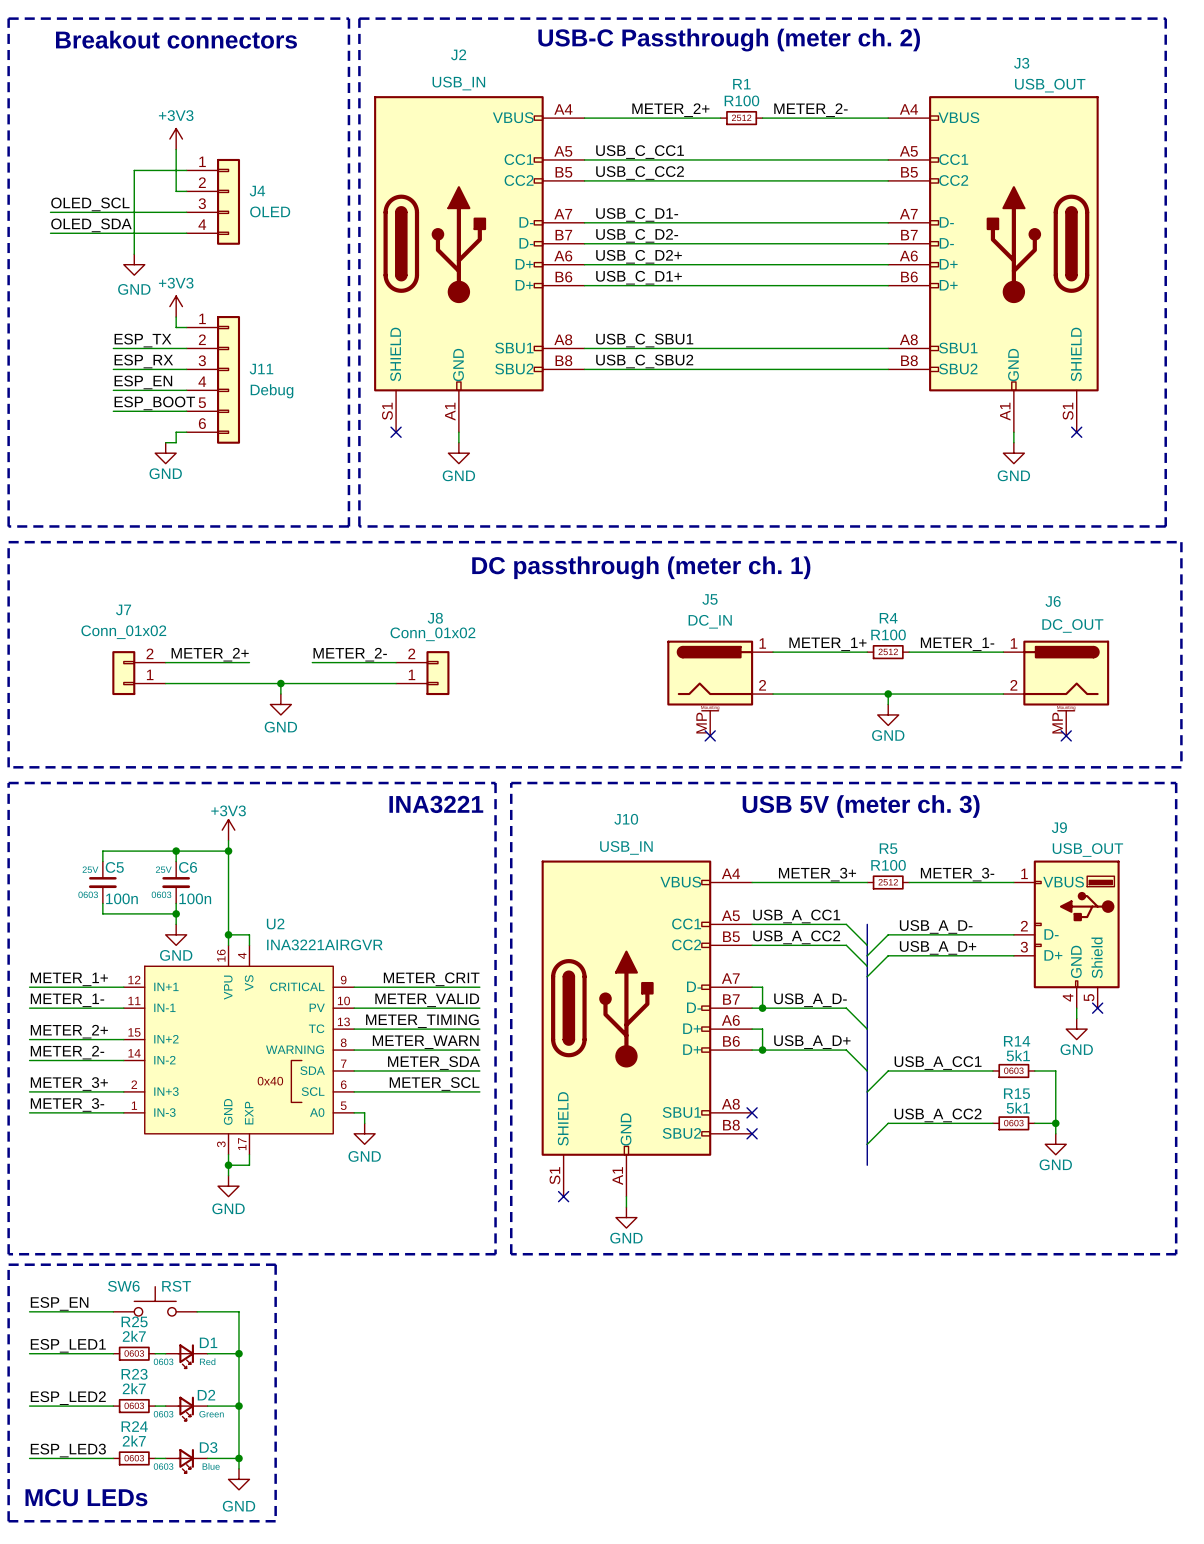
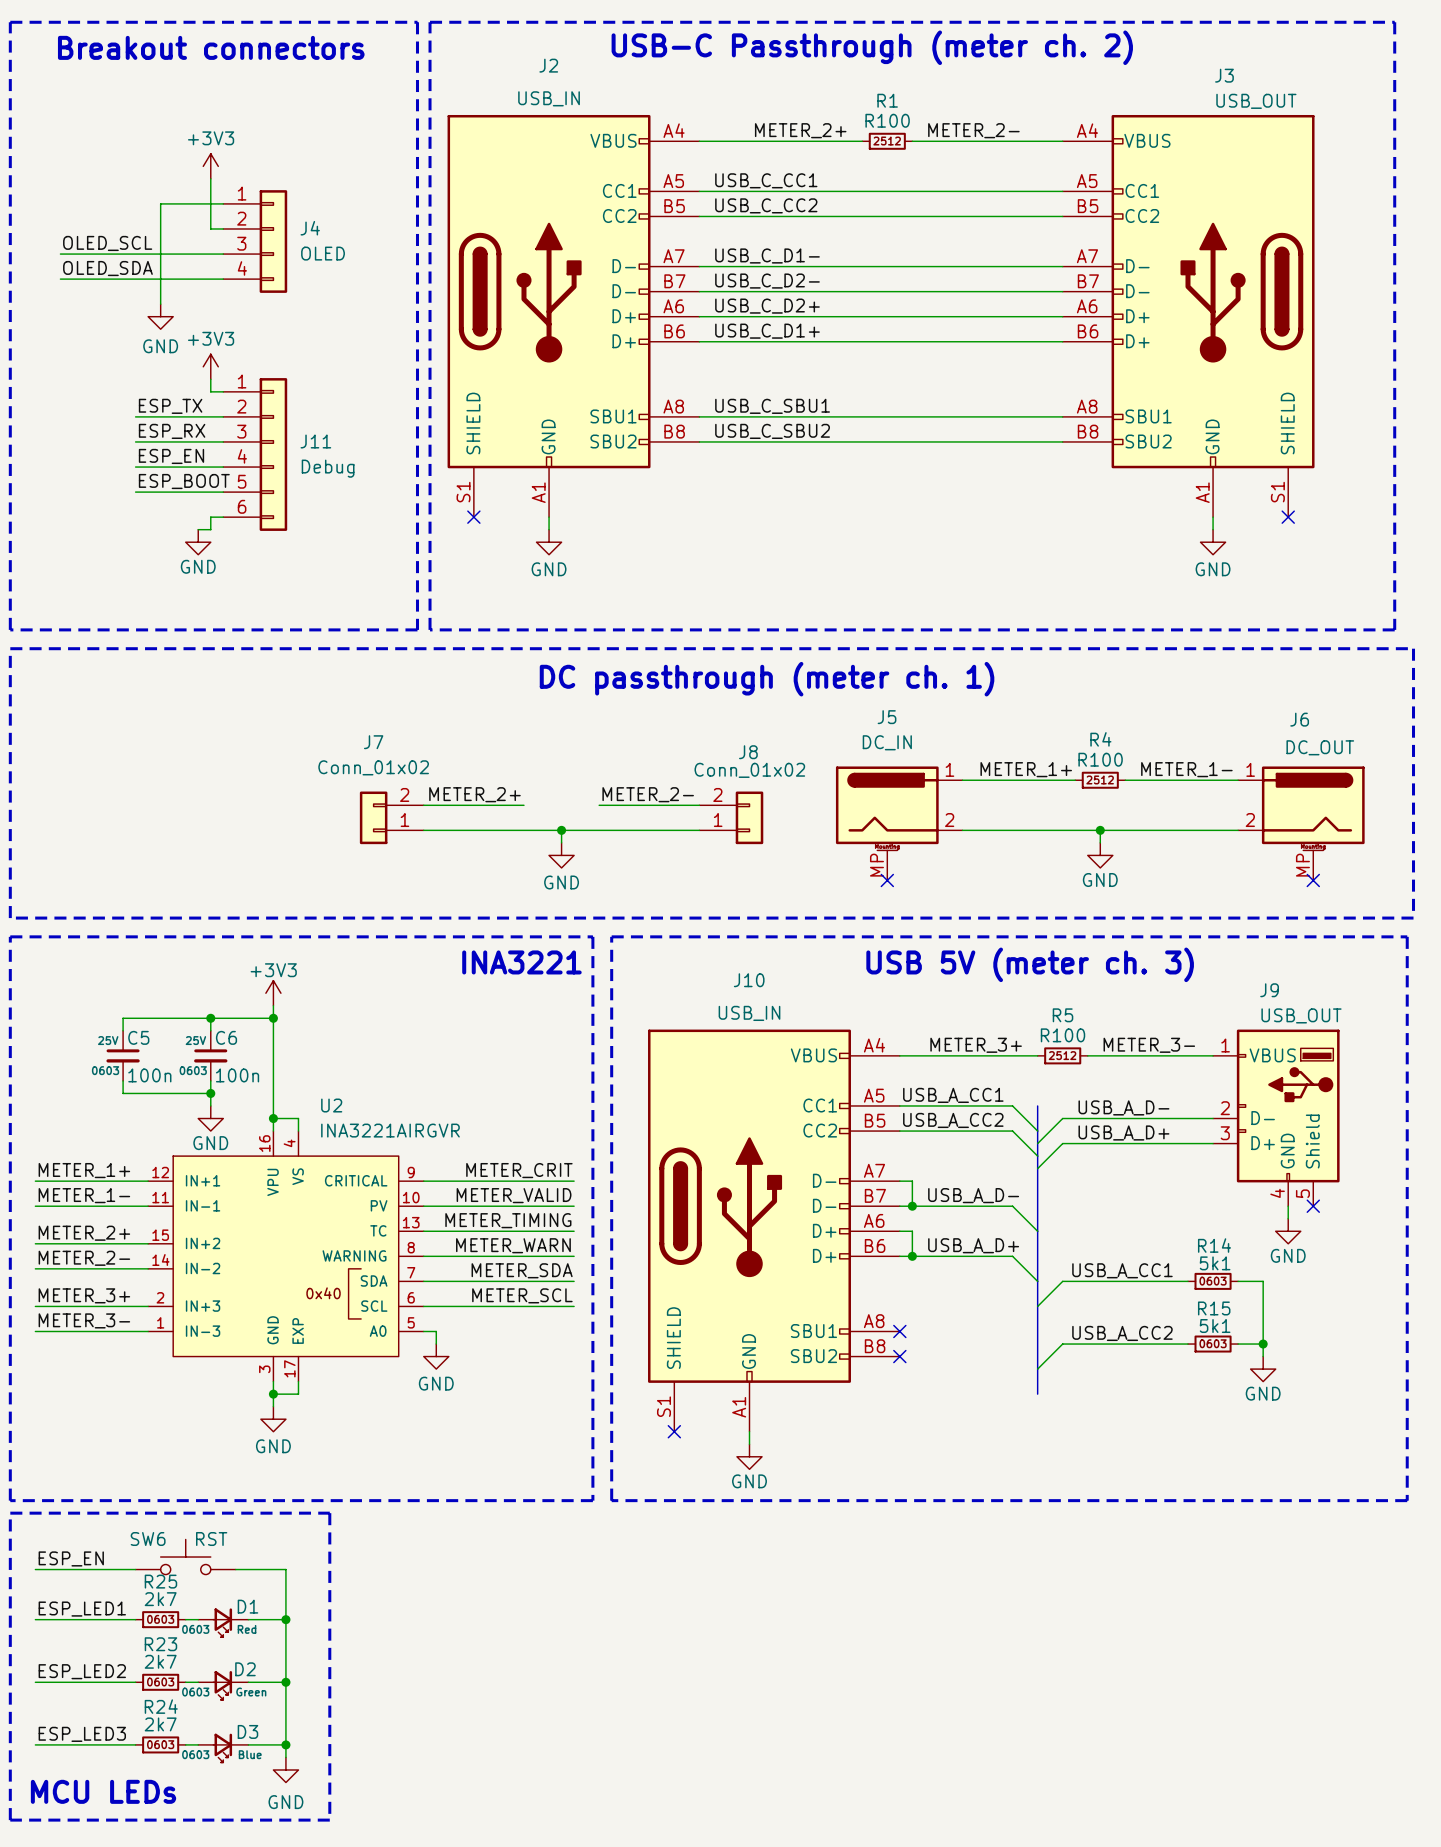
label position: METER_1+ (827, 644) -> METER_1+ (1026, 769)
label position: METER_1- (957, 644) -> METER_1- (1186, 769)
R4 position: (888, 652) -> (1100, 780)
label position: METER_2+ (210, 654) -> METER_2+ (474, 794)
label position: METER_2- (350, 654) -> METER_2- (648, 794)
wire: (165, 662) (249, 662) -> (423, 805) (523, 805)
wire: (312, 662) (396, 662) -> (599, 805) (699, 805)
J7 position: (138, 673) -> (391, 817)
J8 position: (422, 673) -> (731, 817)
wire: (165, 683) (396, 683) -> (423, 830) (699, 830)
wire: (280, 683) (280, 694) -> (561, 830) (561, 842)
junction: (280, 683) -> none
J5 position: (720, 688) -> (899, 823)
J6 position: (1056, 688) -> (1301, 823)
junction: none -> (561, 830)
wire: (888, 694) (888, 704) -> (1100, 830) (1100, 842)
junction position: (888, 694) -> (1100, 830)
power symbol position: GND (280, 704) -> GND (561, 855)
power symbol position: GND (888, 714) -> GND (1100, 855)
no-connect mark position: (710, 735) -> (887, 880)
no-connect mark position: (1066, 735) -> (1313, 880)

